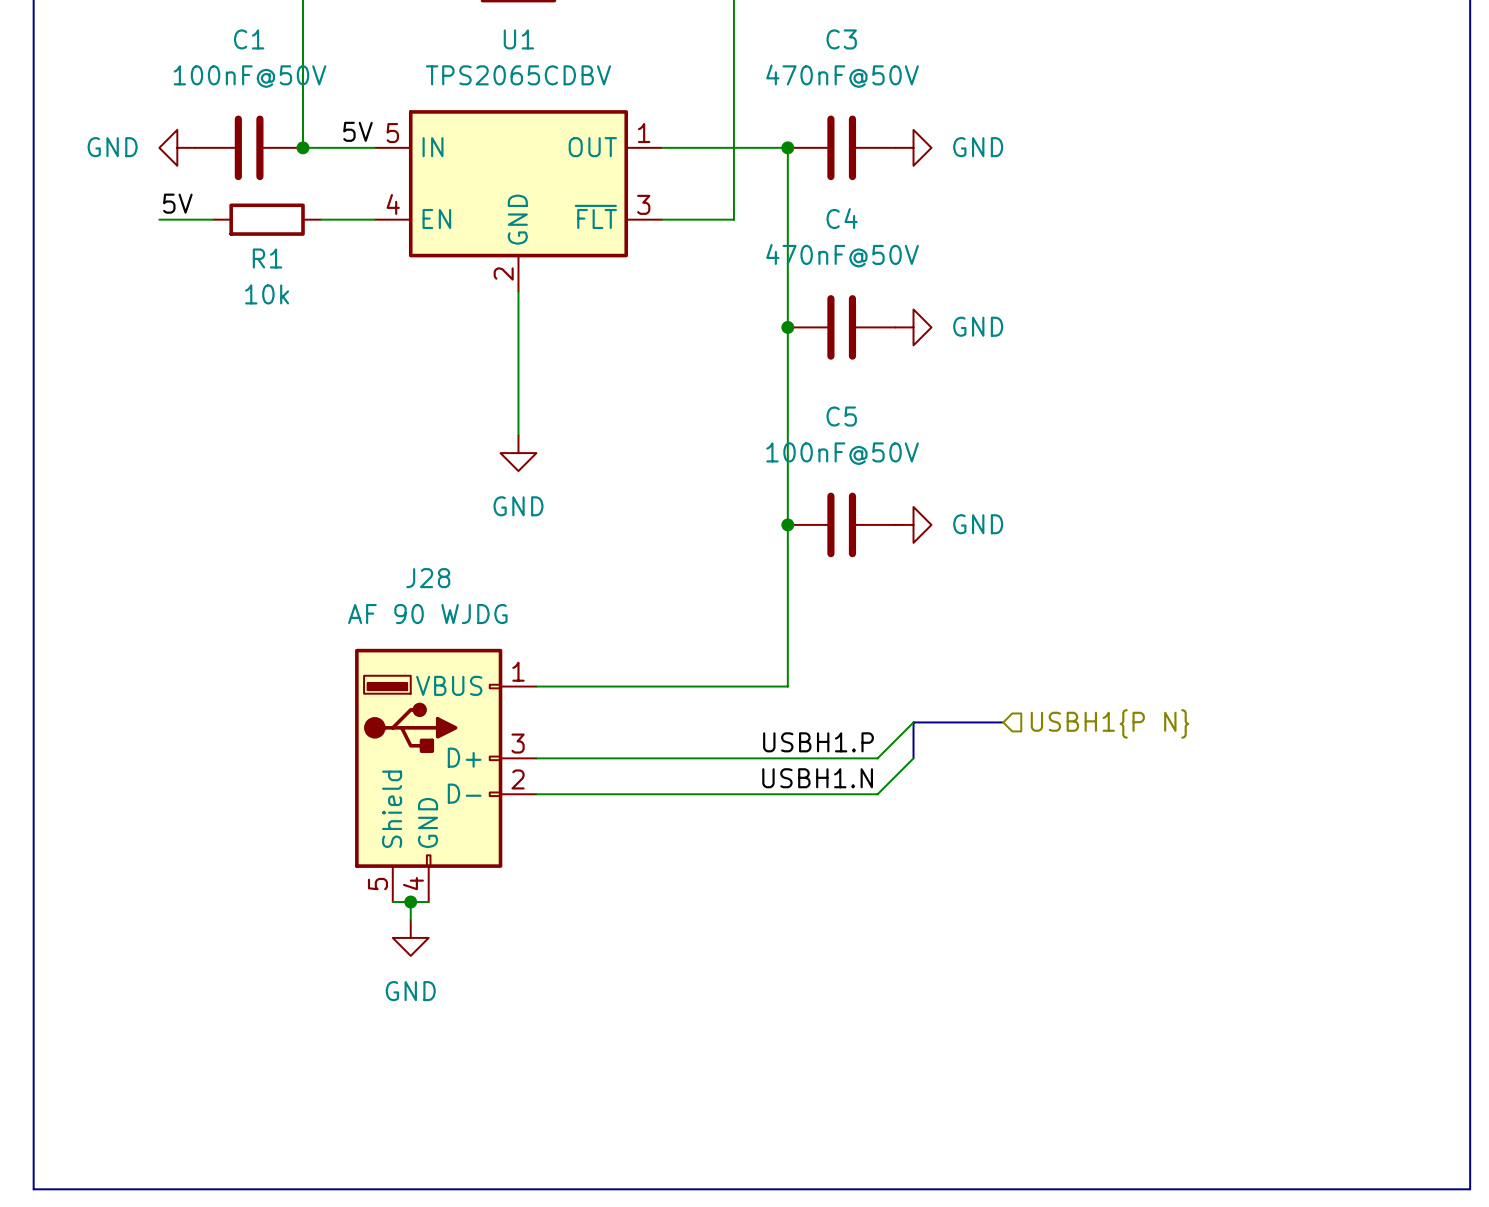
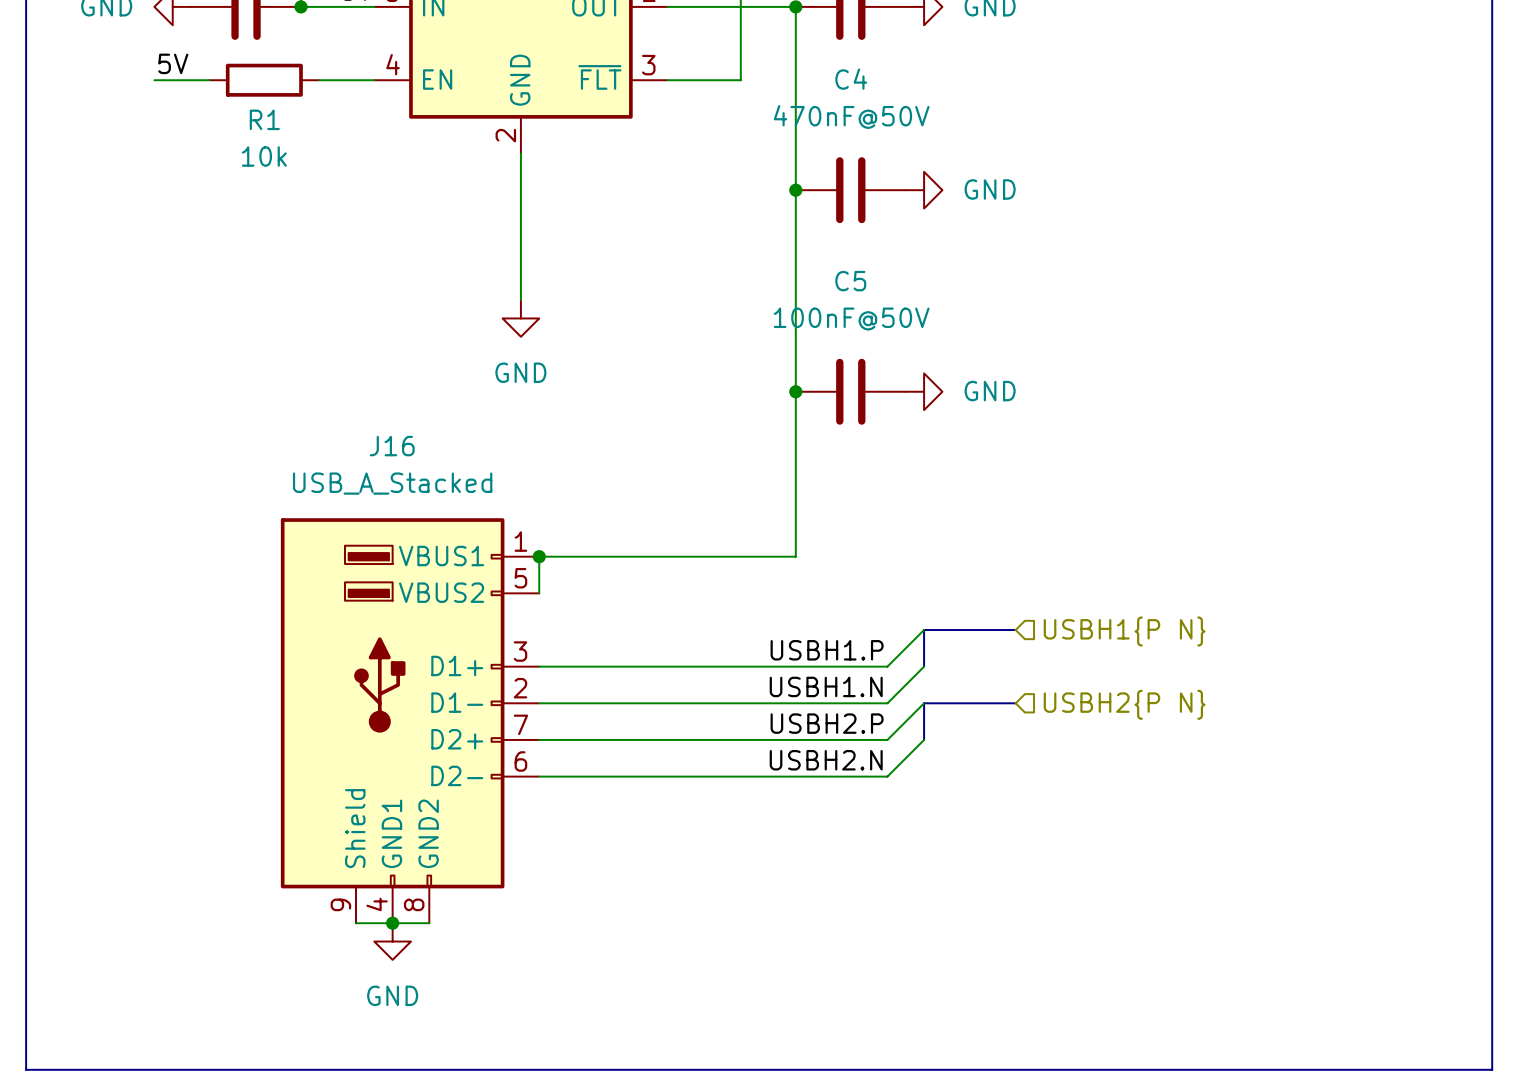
wire: none -> (539, 556) (539, 593)
junction: none -> (539, 556)
wire: (913, 722) (877, 758) (536, 758) -> (924, 666) (887, 703) (539, 703)
bus: (1003, 722) (913, 722) (913, 758) -> (1015, 630) (924, 630) (924, 666)
hierarchical label position: USBH1{P N} (1110, 723) -> USBH1{P N} (1124, 631)
label: USBH1.P (818, 742) -> none
J28: AF 90 WJDG (445, 775) -> none
label: USBH1.N (817, 778) -> USBH1.P (827, 650)
label: none -> USBH1.N (826, 686)
wire: none -> (924, 703) (887, 739) (539, 739)
bus: none -> (1015, 703) (924, 703) (924, 739)
hierarchical label: none -> USBH2{P N} (1124, 704)
J16: none -> USB_A_Stacked (410, 720)
label: none -> USBH2.P (827, 723)
wire: none -> (924, 739) (887, 776) (539, 776)
label: none -> USBH2.N (826, 760)
junction: (410, 902) -> none
power symbol position: GND (410, 937) -> GND (392, 941)
wire: none -> (355, 923) (429, 923)
junction: none -> (392, 923)

